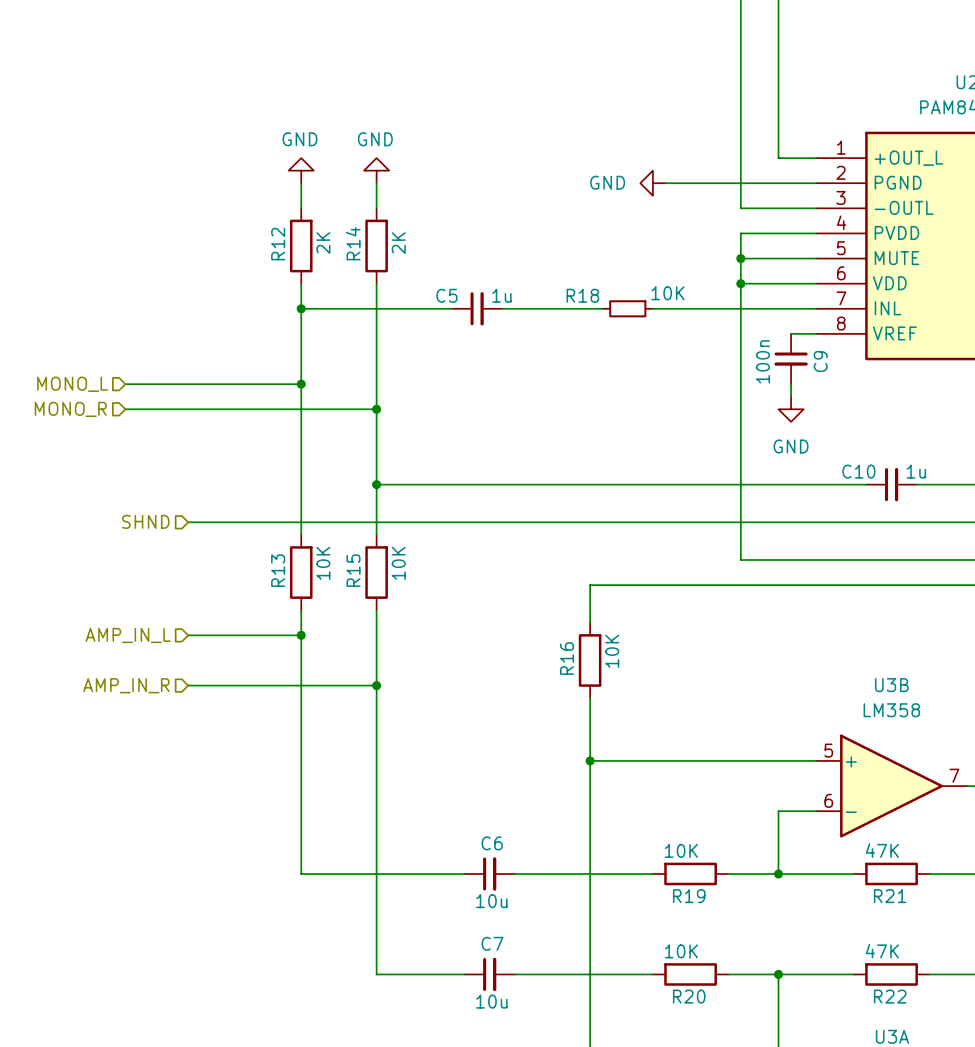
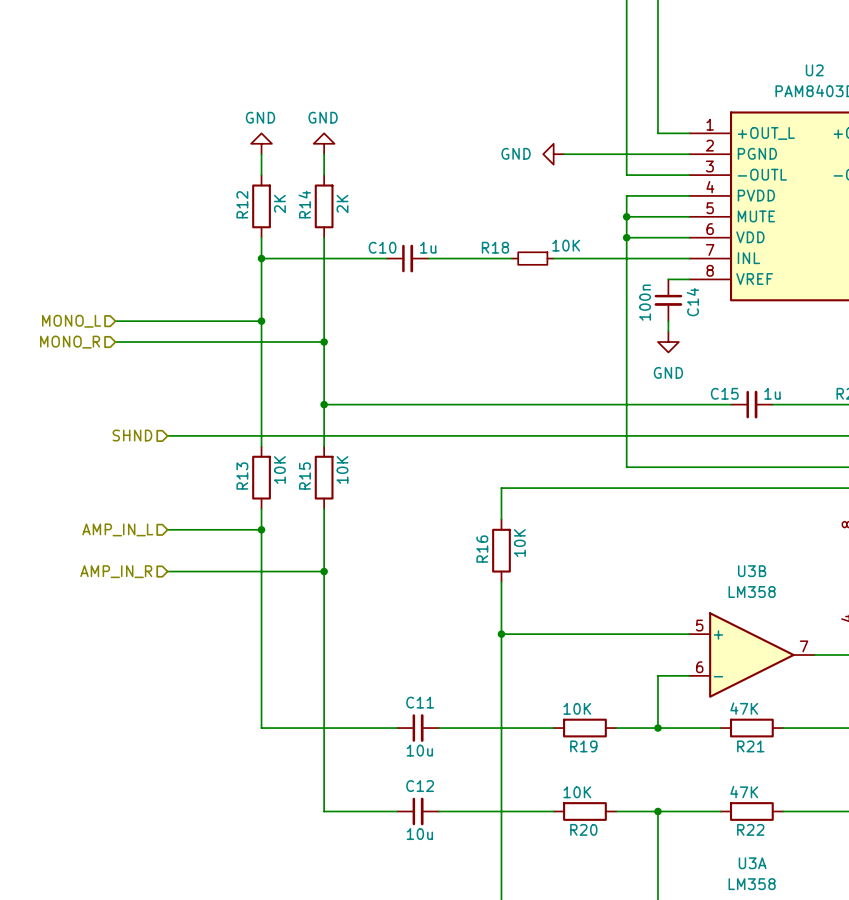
C5 name: C5 (446, 295) -> C10 (382, 247)
C9 name: C9 (820, 361) -> C14 (692, 302)
C10 name: C10 (858, 471) -> C15 (724, 393)
C6 name: C6 (492, 843) -> C11 (420, 702)
C7 name: C7 (492, 943) -> C12 (420, 786)

